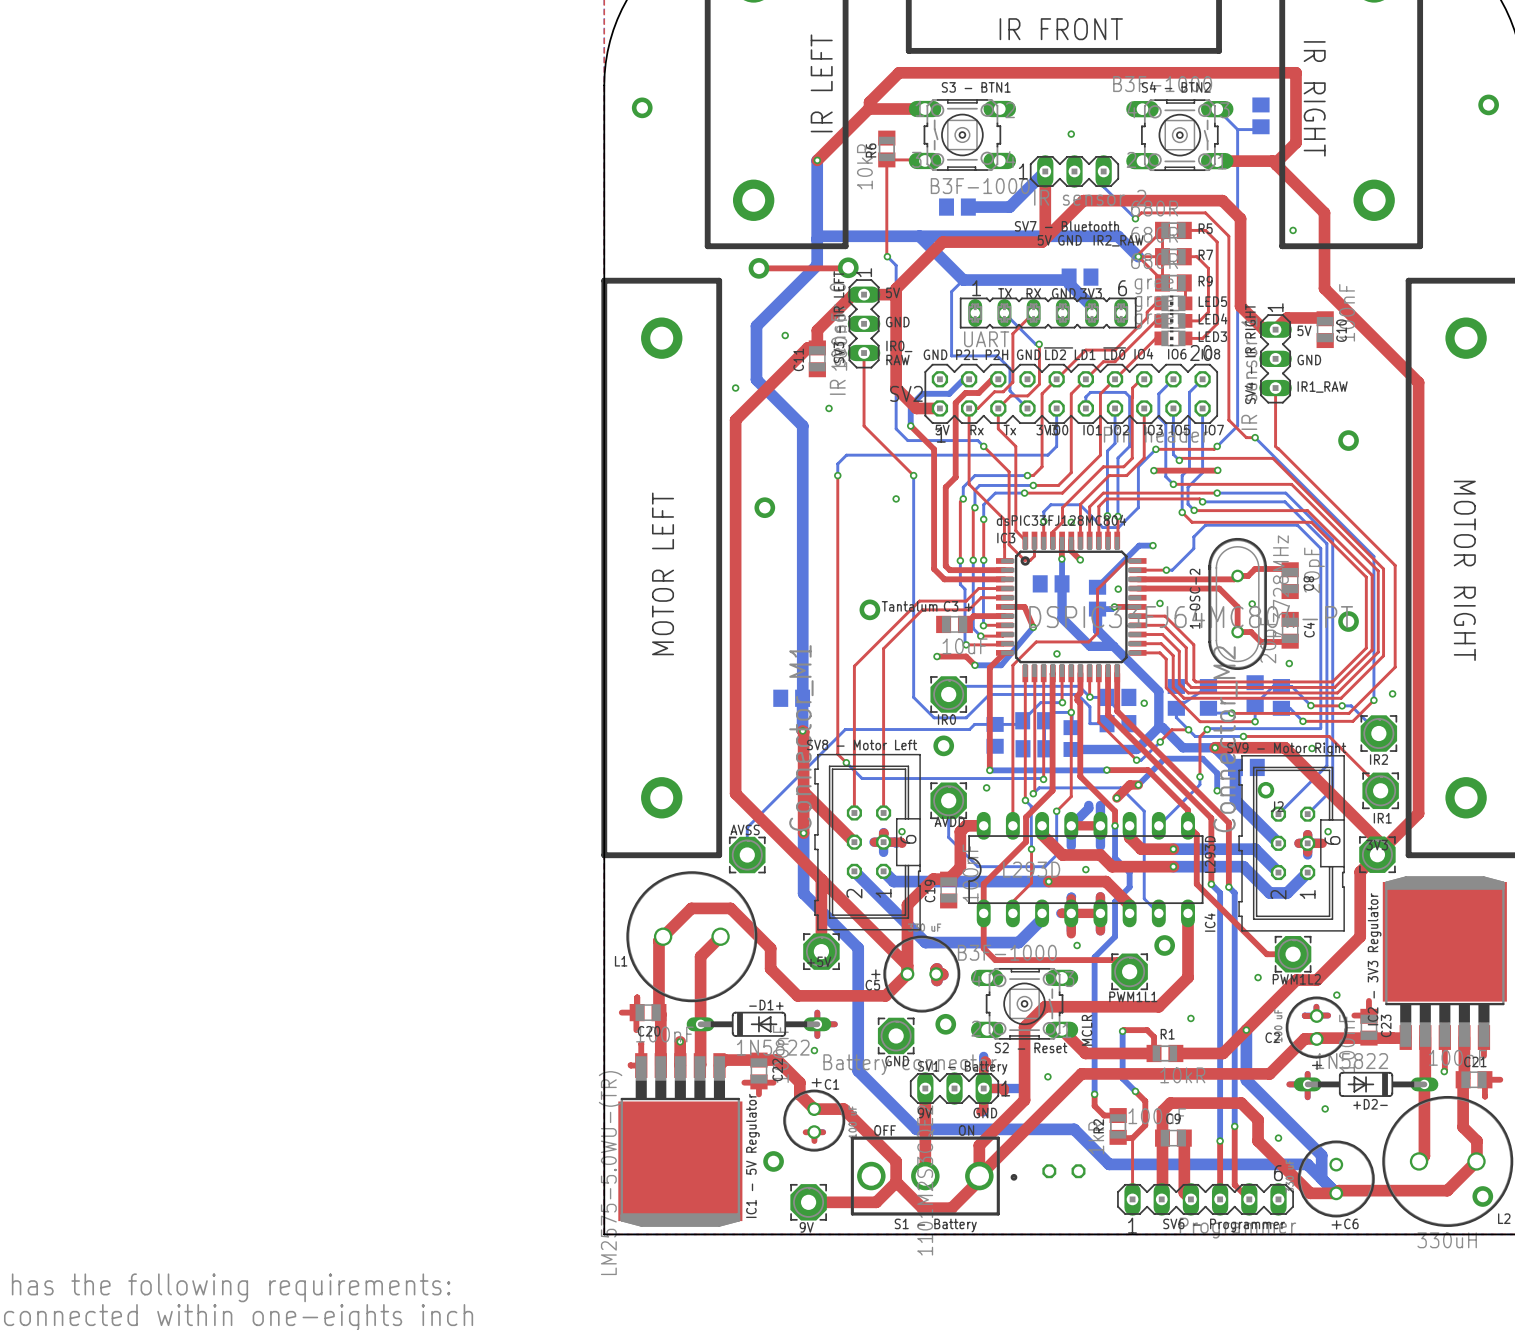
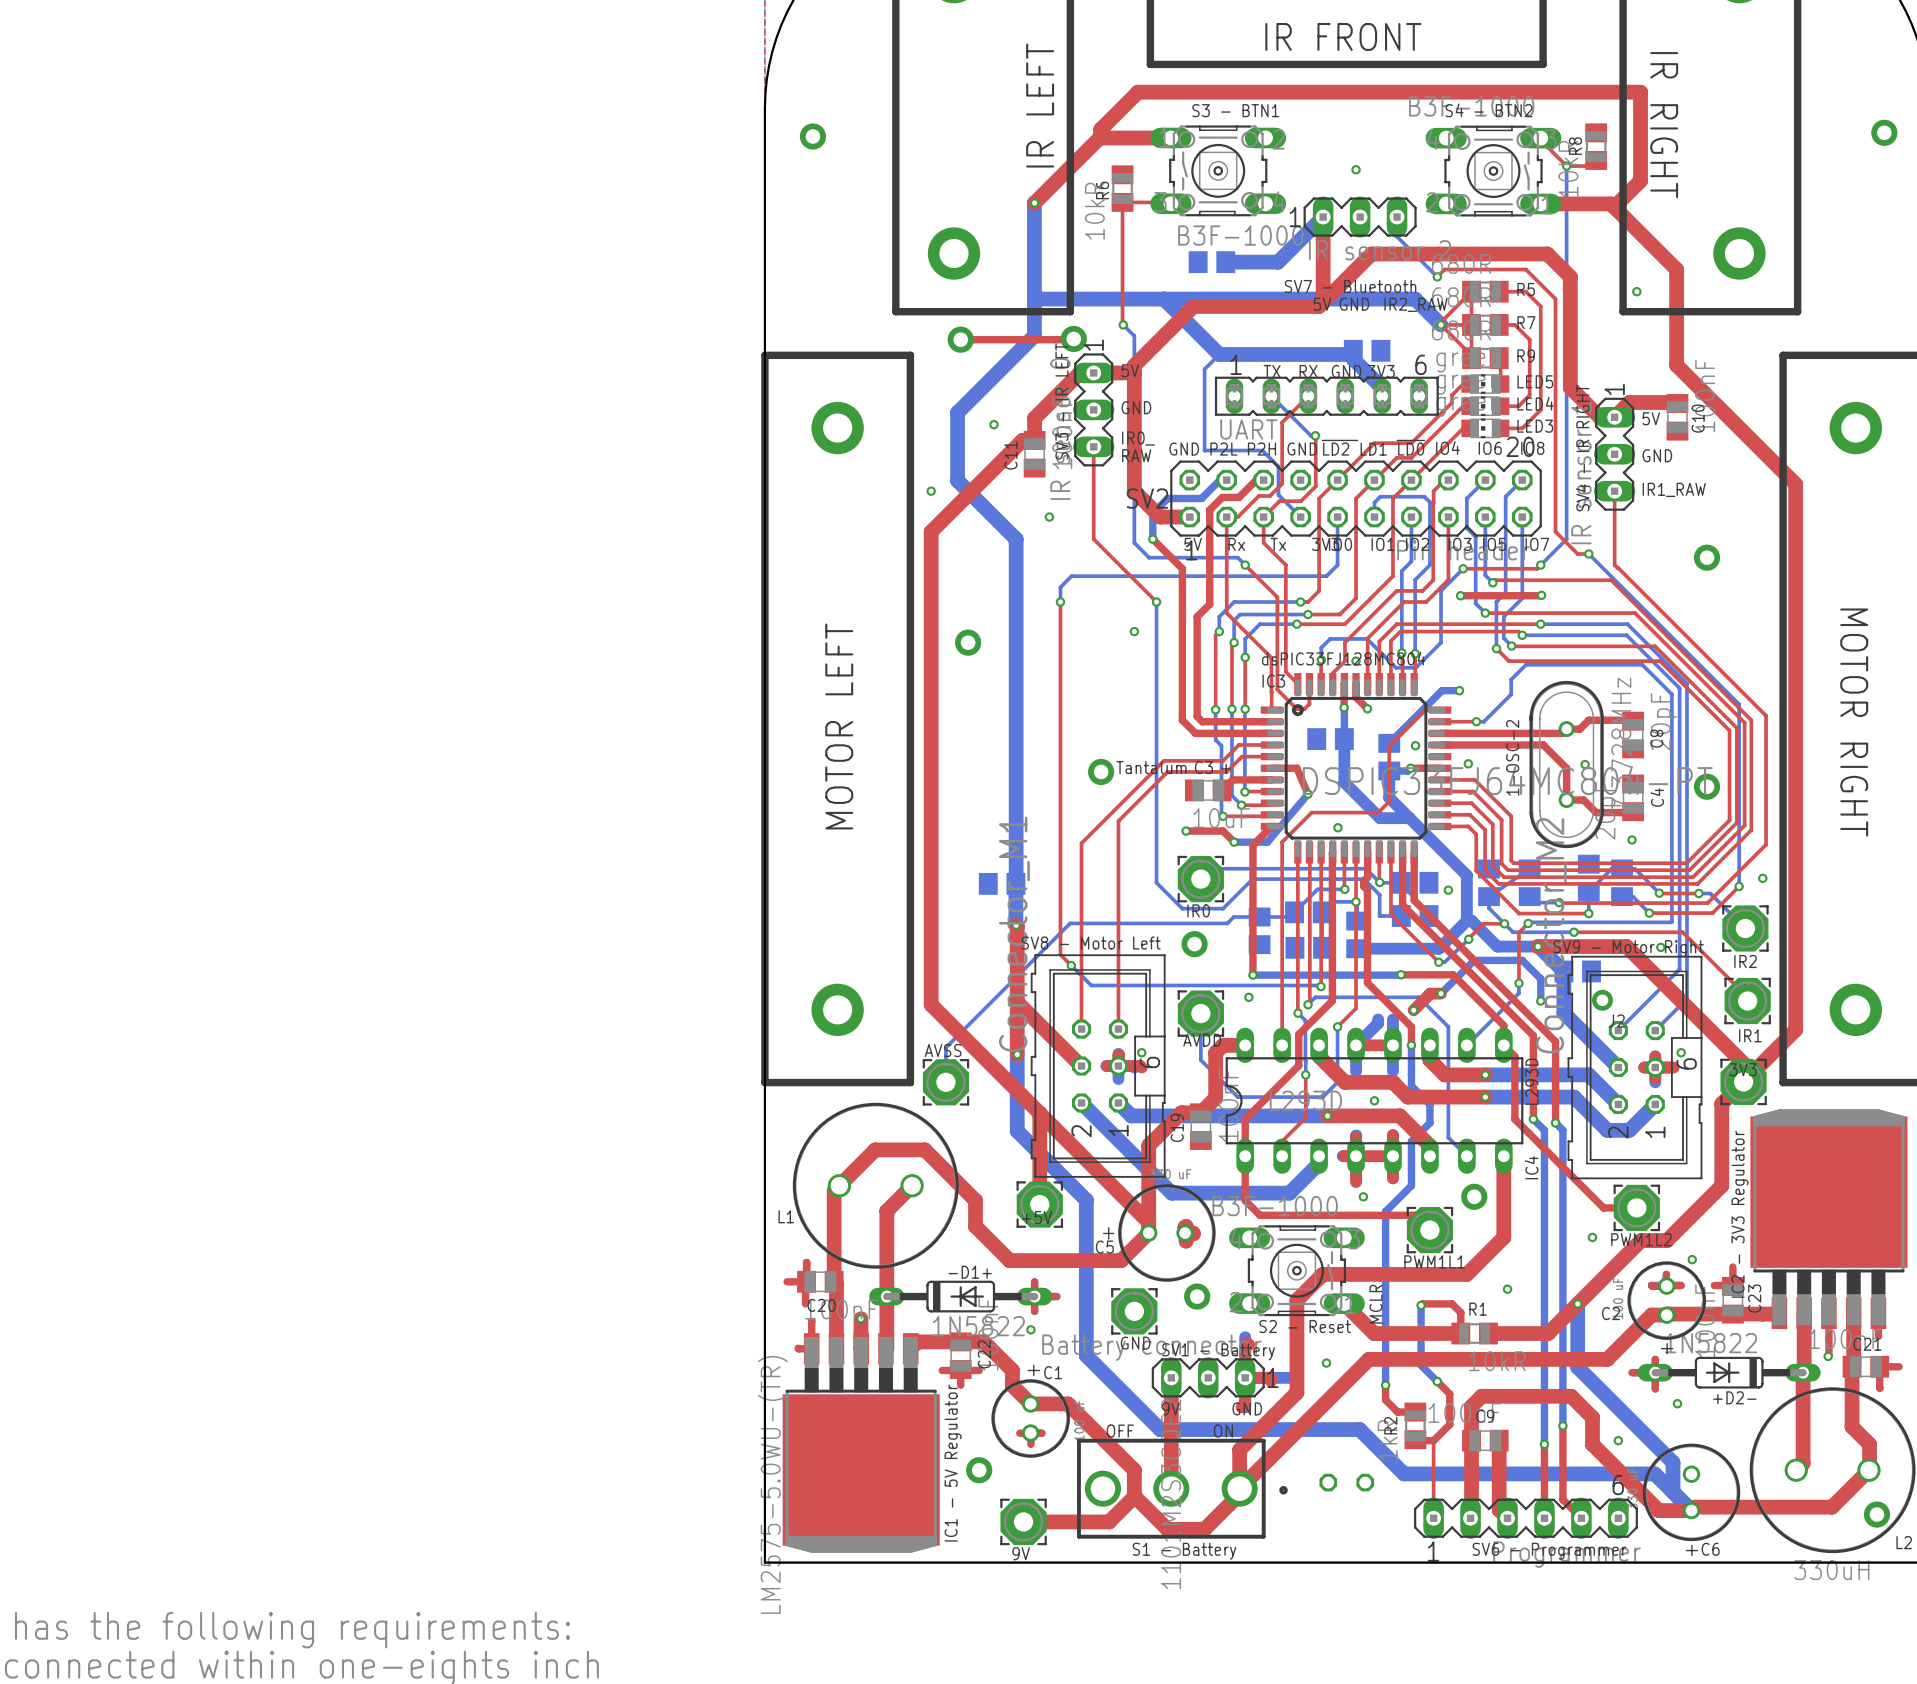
top track: none -> (1540, 138) (1566, 166) (1590, 166) (1596, 160)
bottom track: (1217, 109) (1237, 129) (1258, 129) (1260, 126) -> none
text: none -> R8 (1575, 146)
part side: bottom (1260, 115) -> top (1596, 146)
via: none -> (1566, 166)

